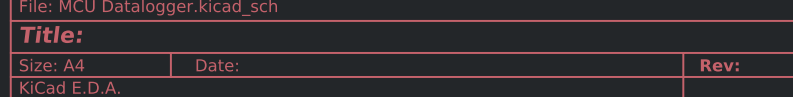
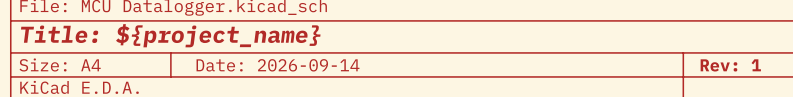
title block: Title: (51, 34) -> Title: ${project_name} (170, 35)
title block: Date: (217, 65) -> Date: 2026-09-14 (277, 65)
title block: Rev: (719, 65) -> Rev: 1 (730, 65)

